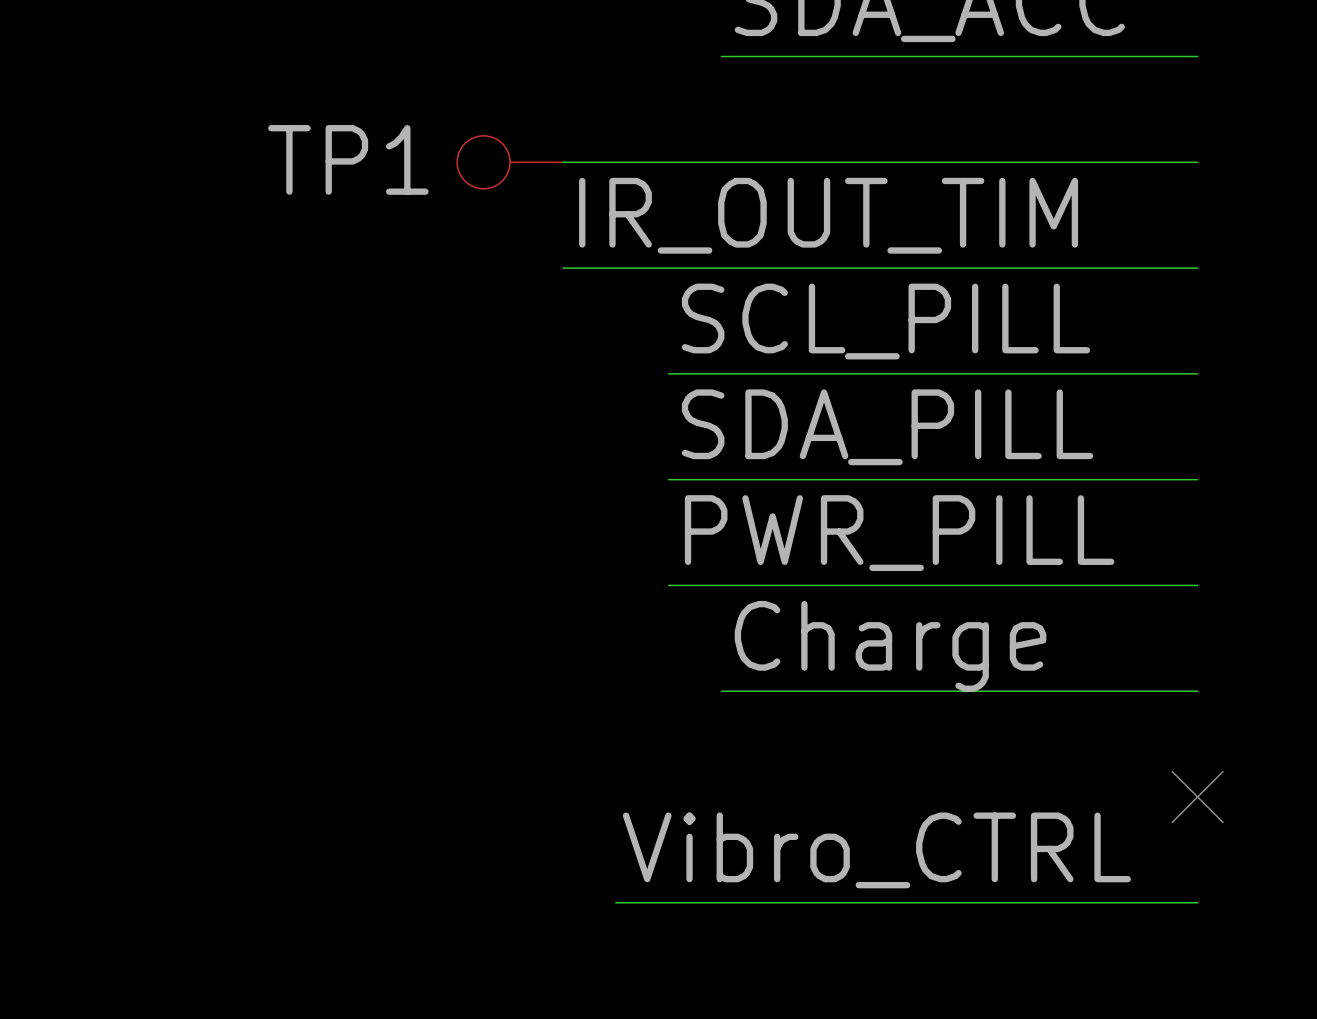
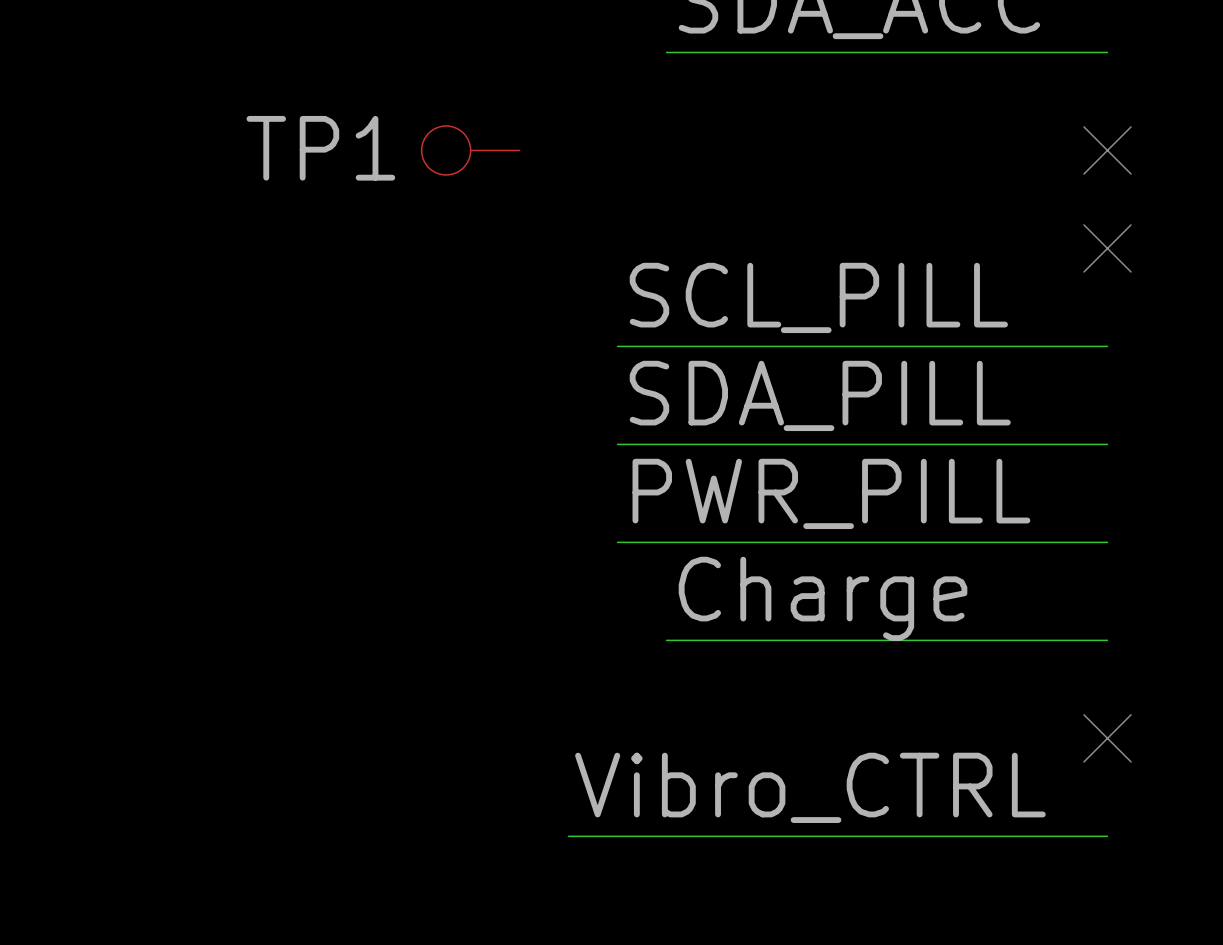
wire: (562, 162) (1197, 162) -> none
no-connect mark: none -> (1107, 150)
label: IR_OUT_TIM (828, 215) -> none
wire: (562, 268) (1197, 268) -> none
no-connect mark: none -> (1107, 248)

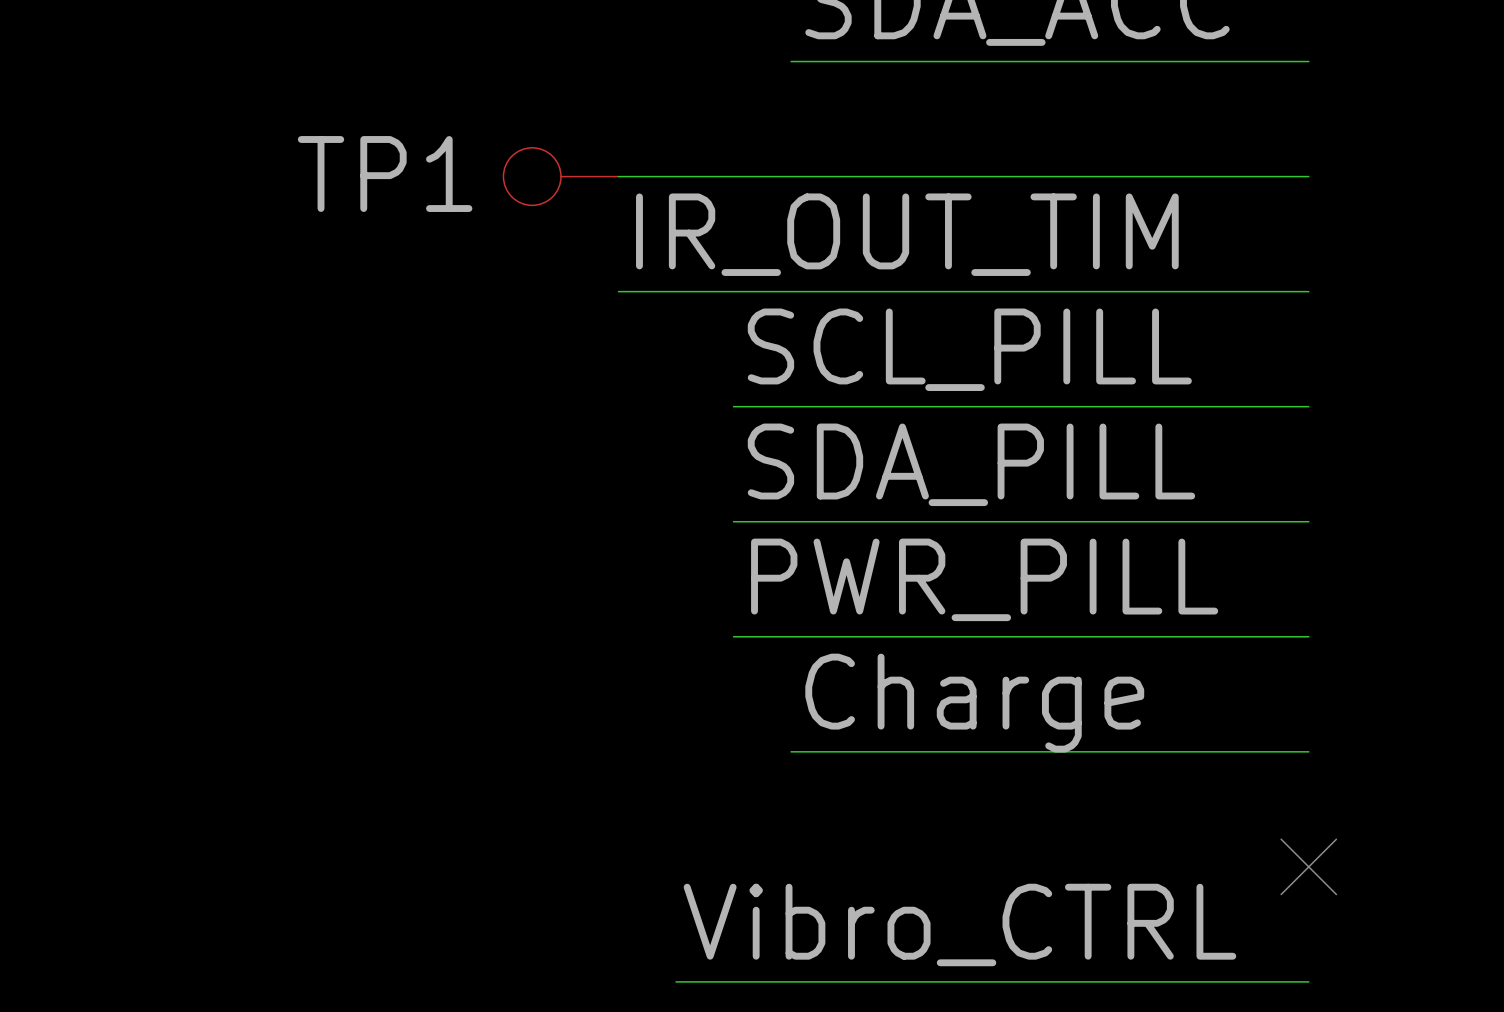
wire: none -> (618, 176) (1308, 176)
no-connect mark: (1107, 150) -> none
label: none -> IR_OUT_TIM (907, 234)
wire: none -> (618, 291) (1308, 291)
no-connect mark: (1107, 248) -> none

